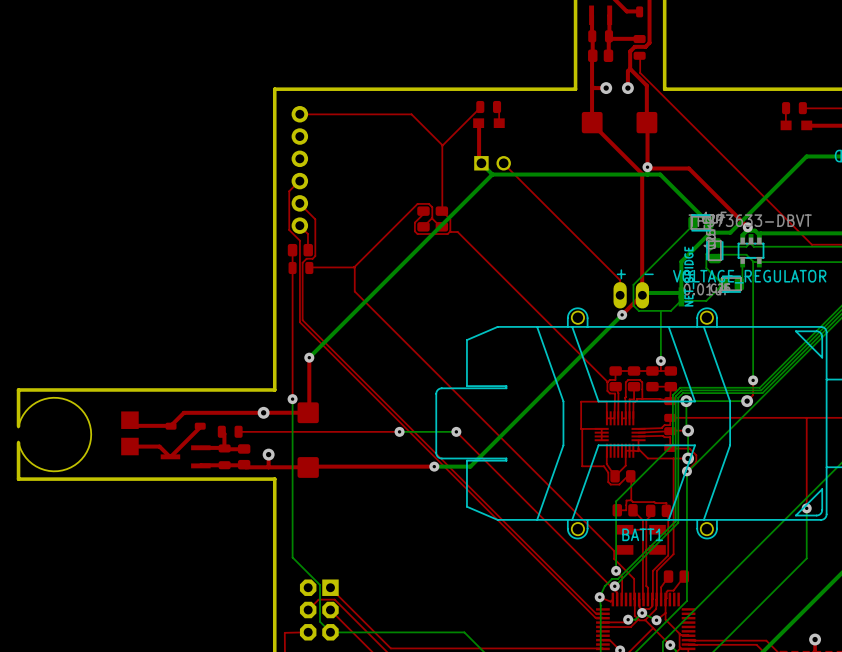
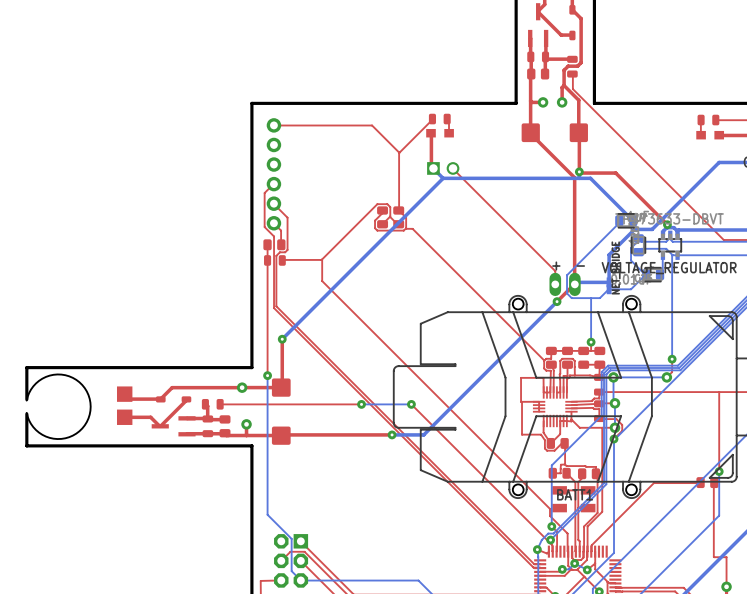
top track: none -> (714, 482) (713, 557) (726, 557) (726, 586)
top track: (668, 576) (661, 587) (661, 599) -> (700, 482) (653, 483) (591, 545) (591, 551)
part position: (676, 576) -> (707, 482)
top track: (684, 576) (673, 590) (666, 591) (665, 599) -> none

